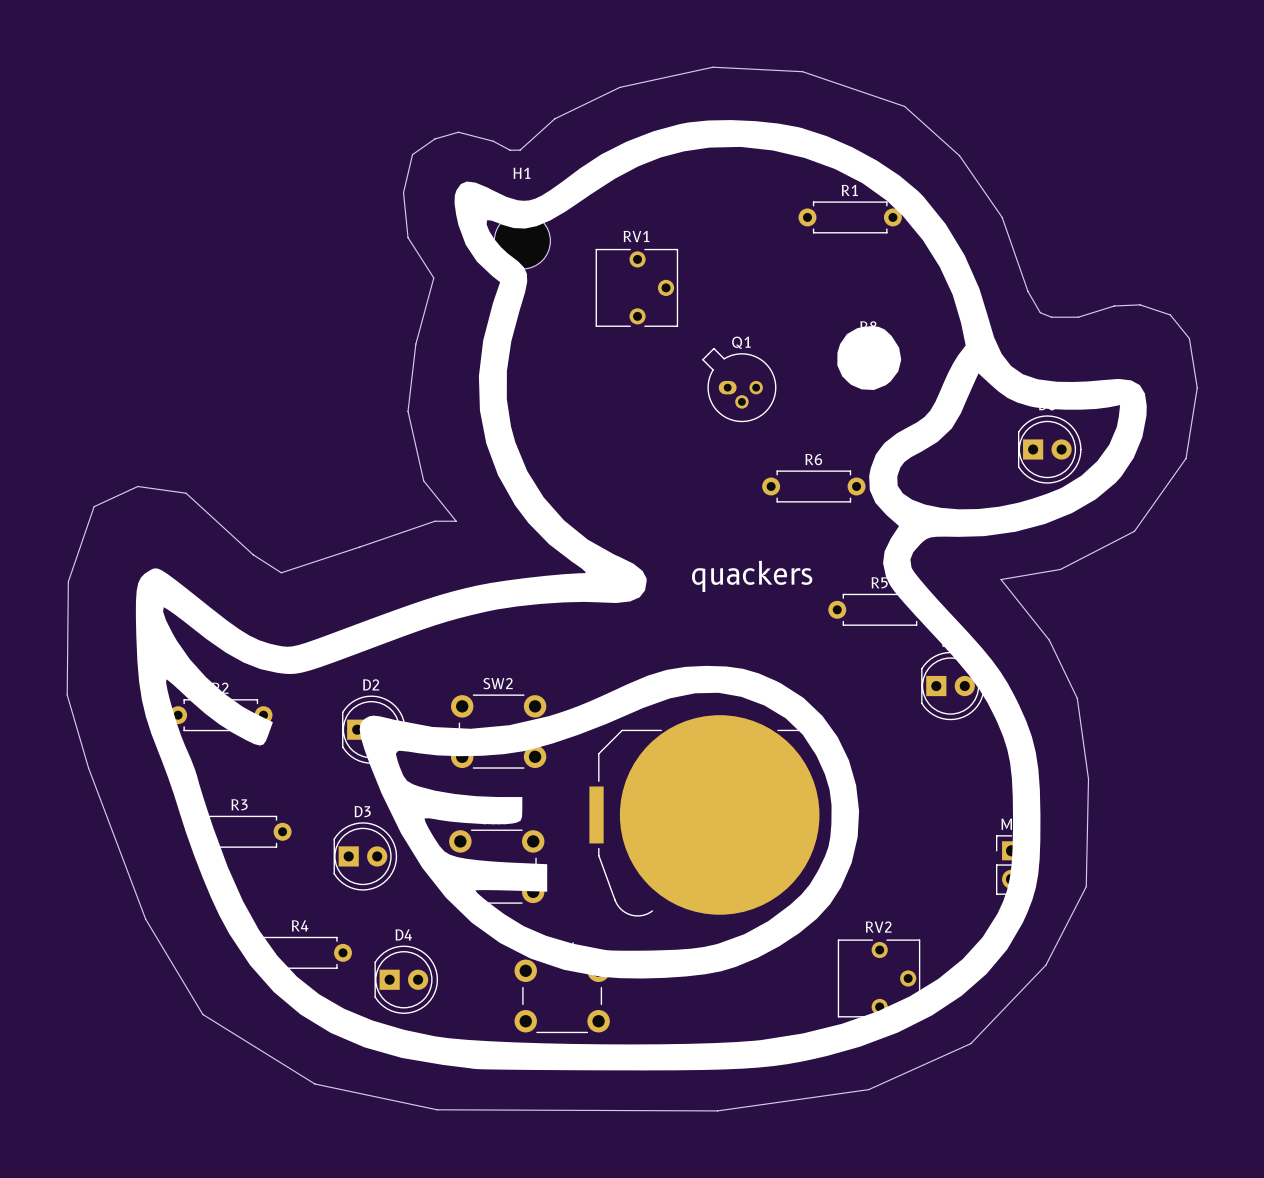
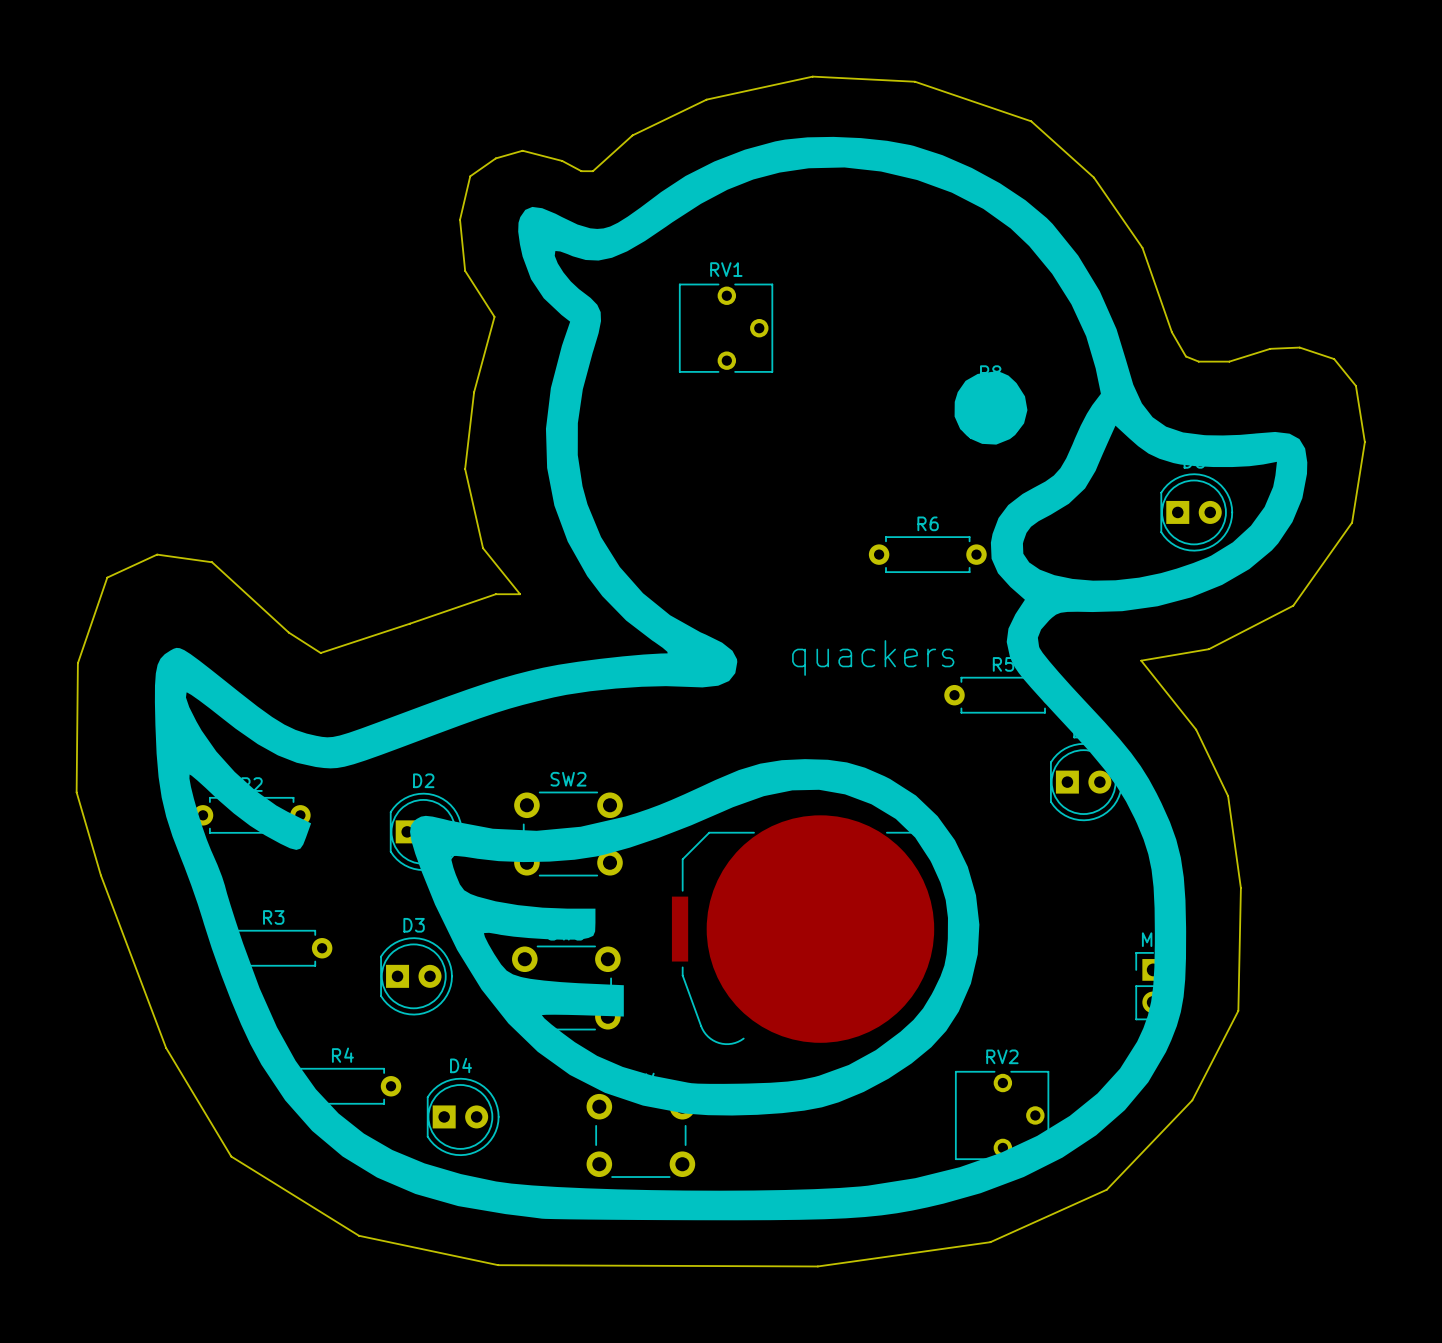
R1: (850, 217) -> none
H1: (522, 240) -> none
Q1: (739, 385) -> none

